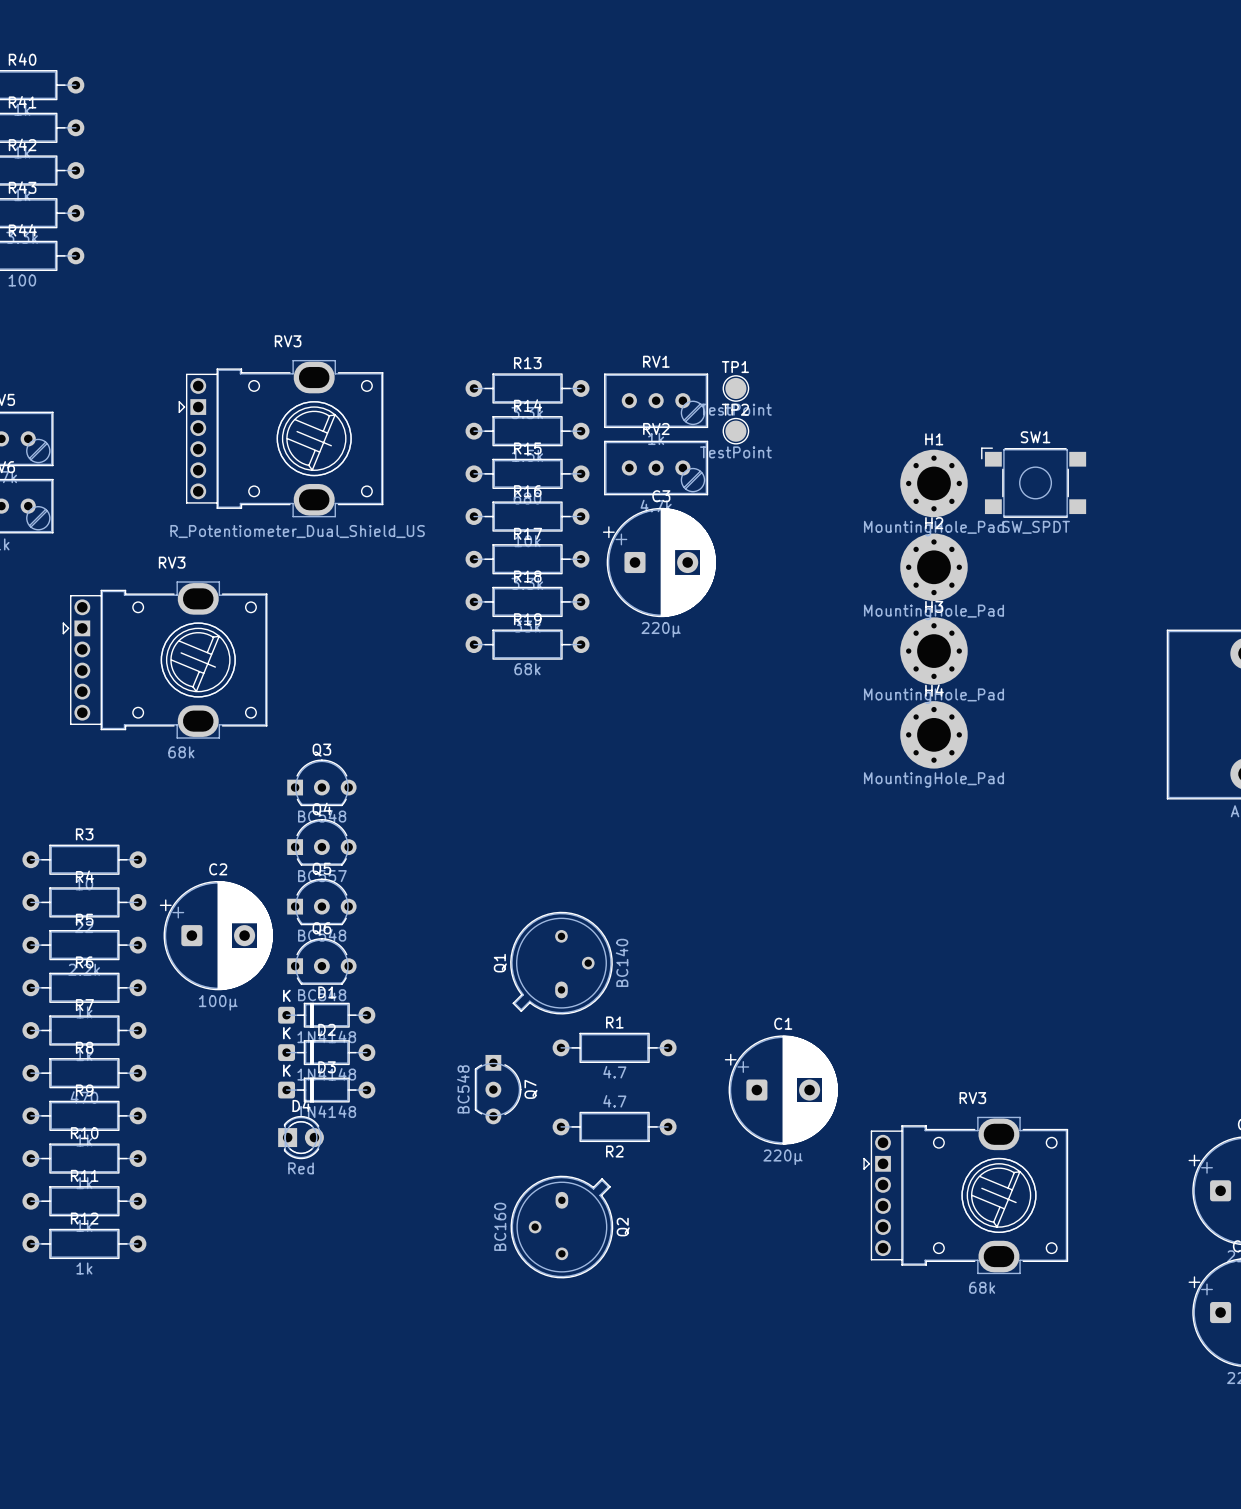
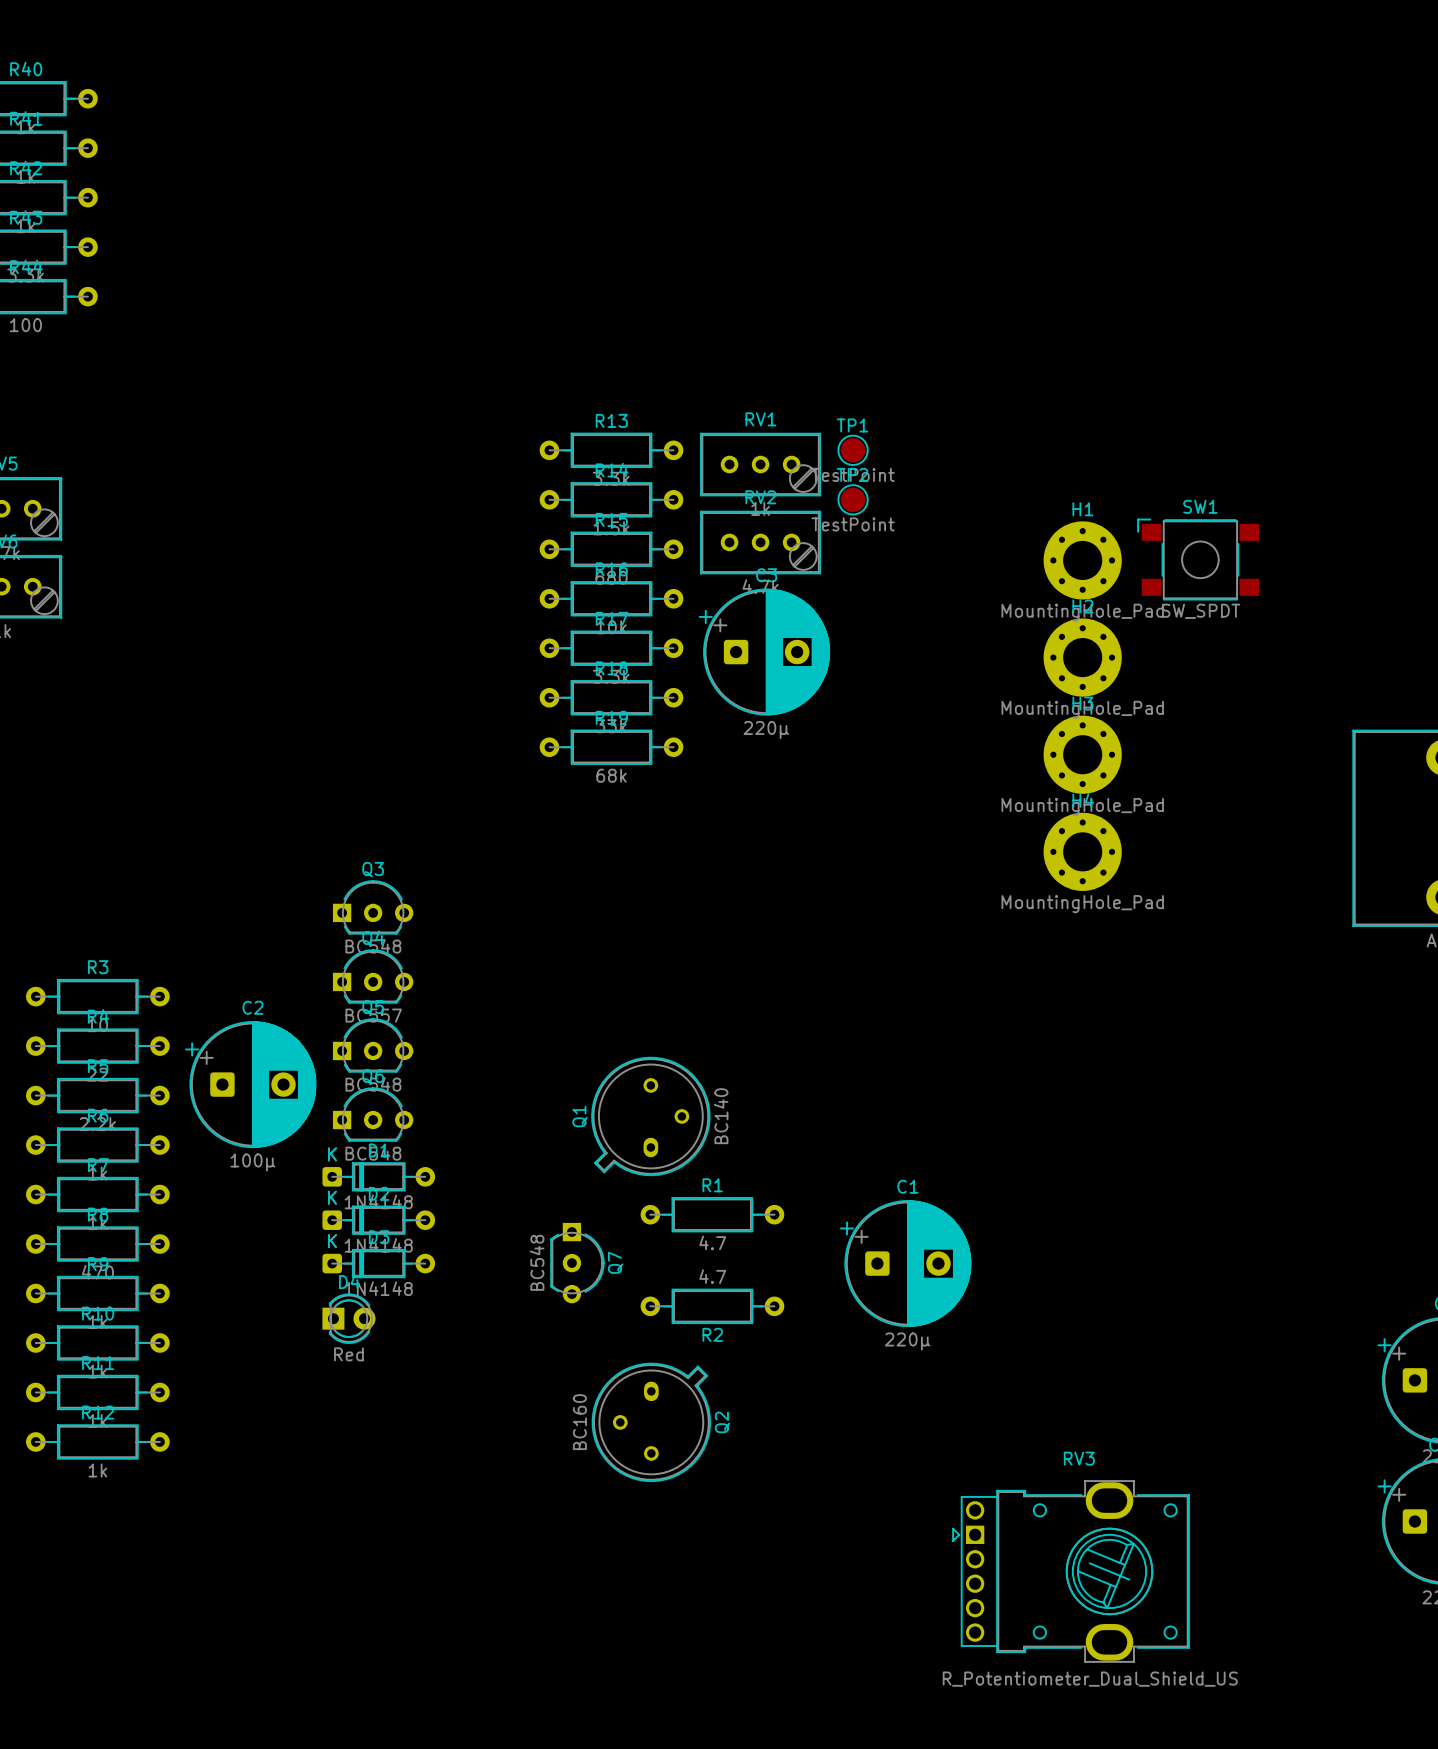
RV3: R_Potentiometer_Dual_Shield_US (281, 438) -> none
RV3: 68k (165, 660) -> none
RV3: 68k (965, 1195) -> none
RV3: none -> R_Potentiometer_Dual_Shield_US (1071, 1571)

